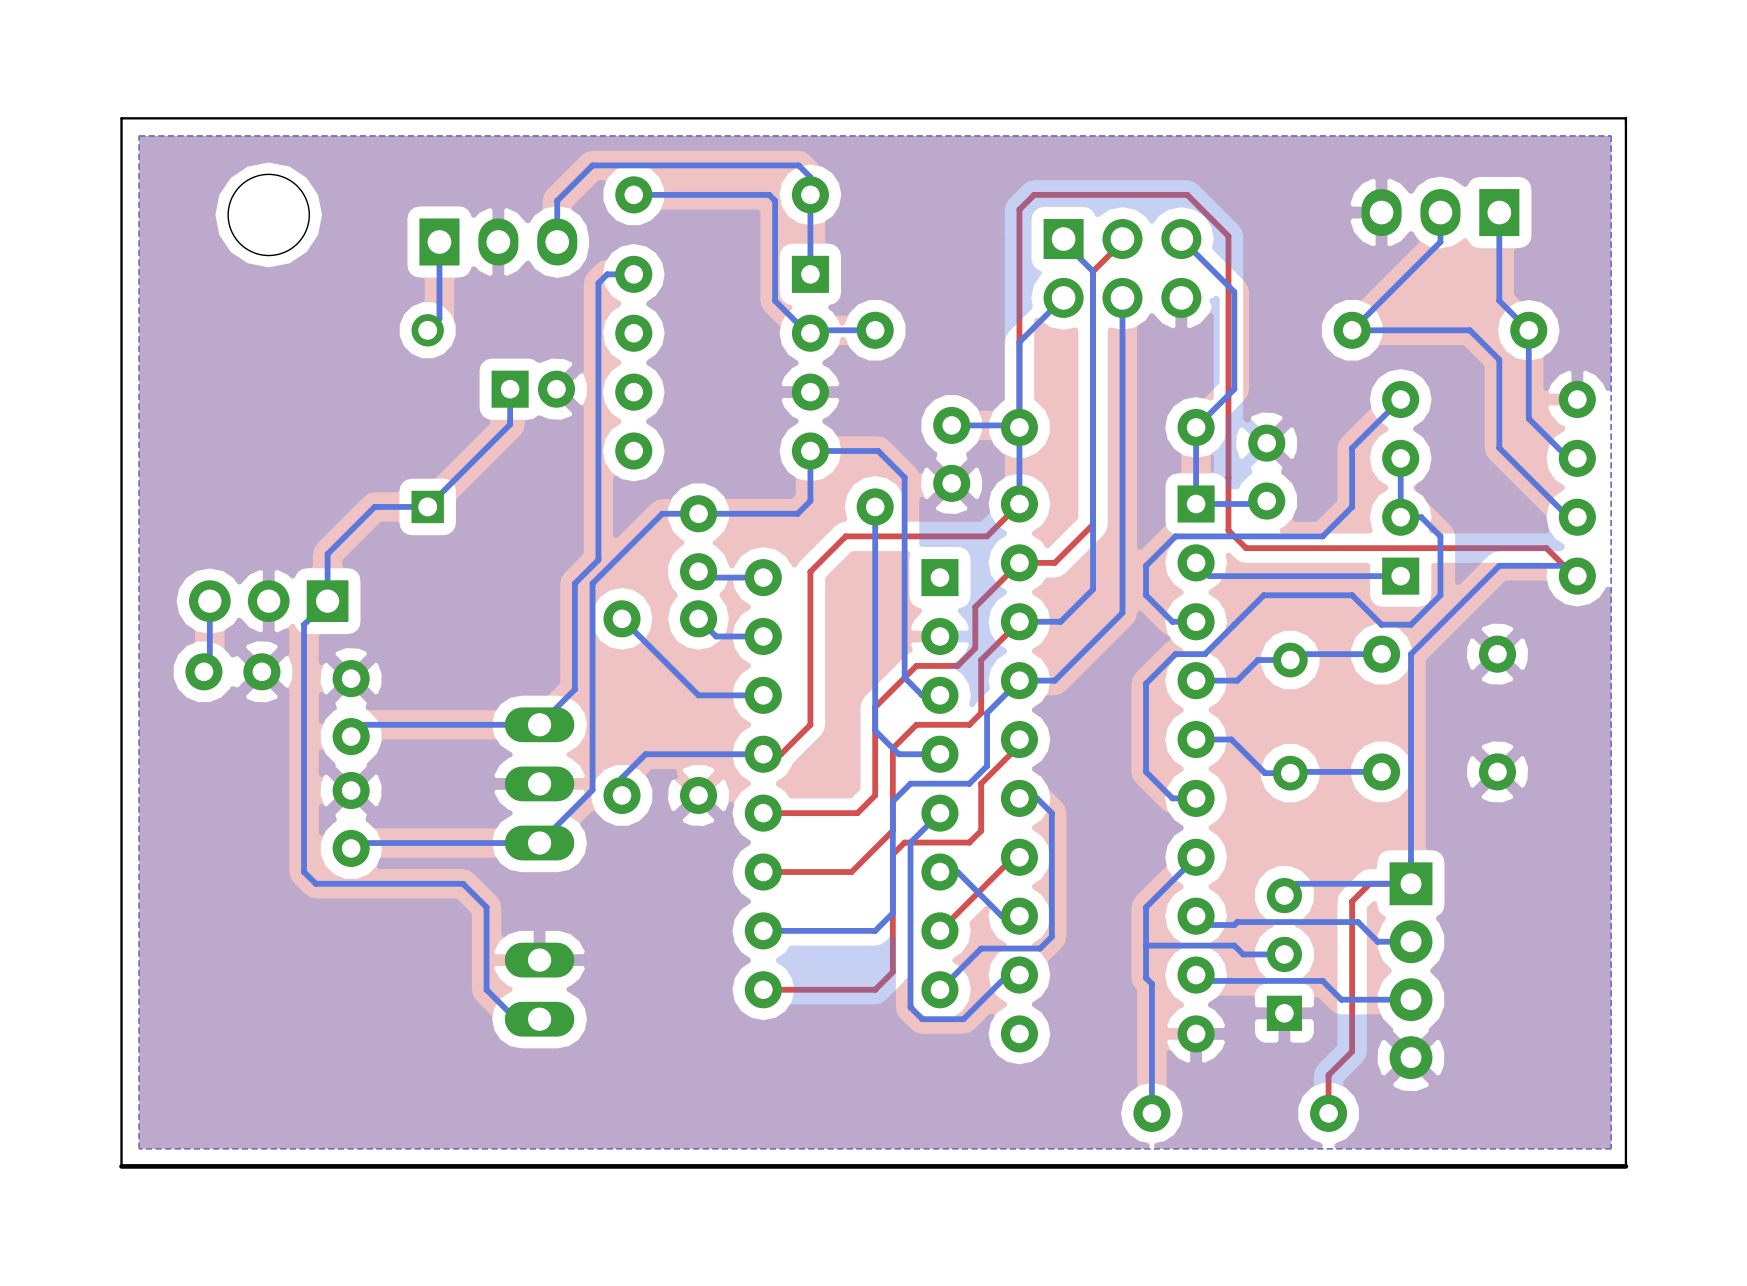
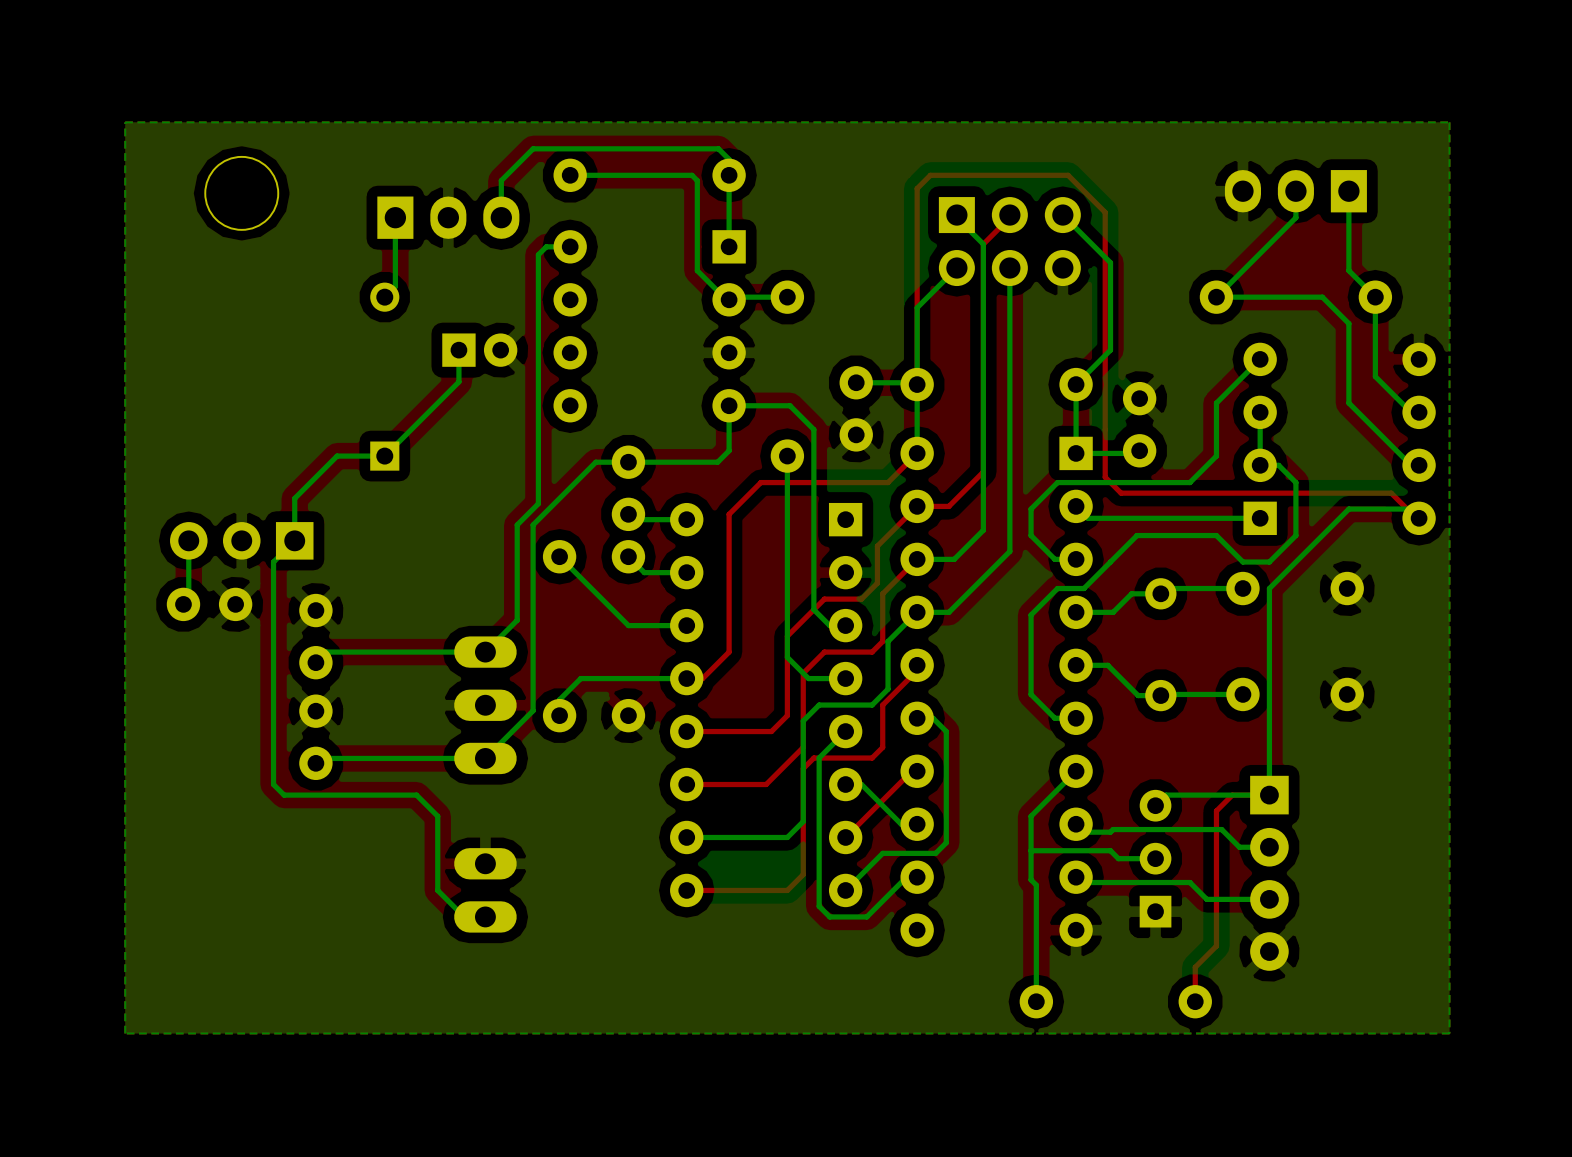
board edge: (1625, 118) (1625, 1166) (121, 1166) (121, 118) (1625, 118) -> none

